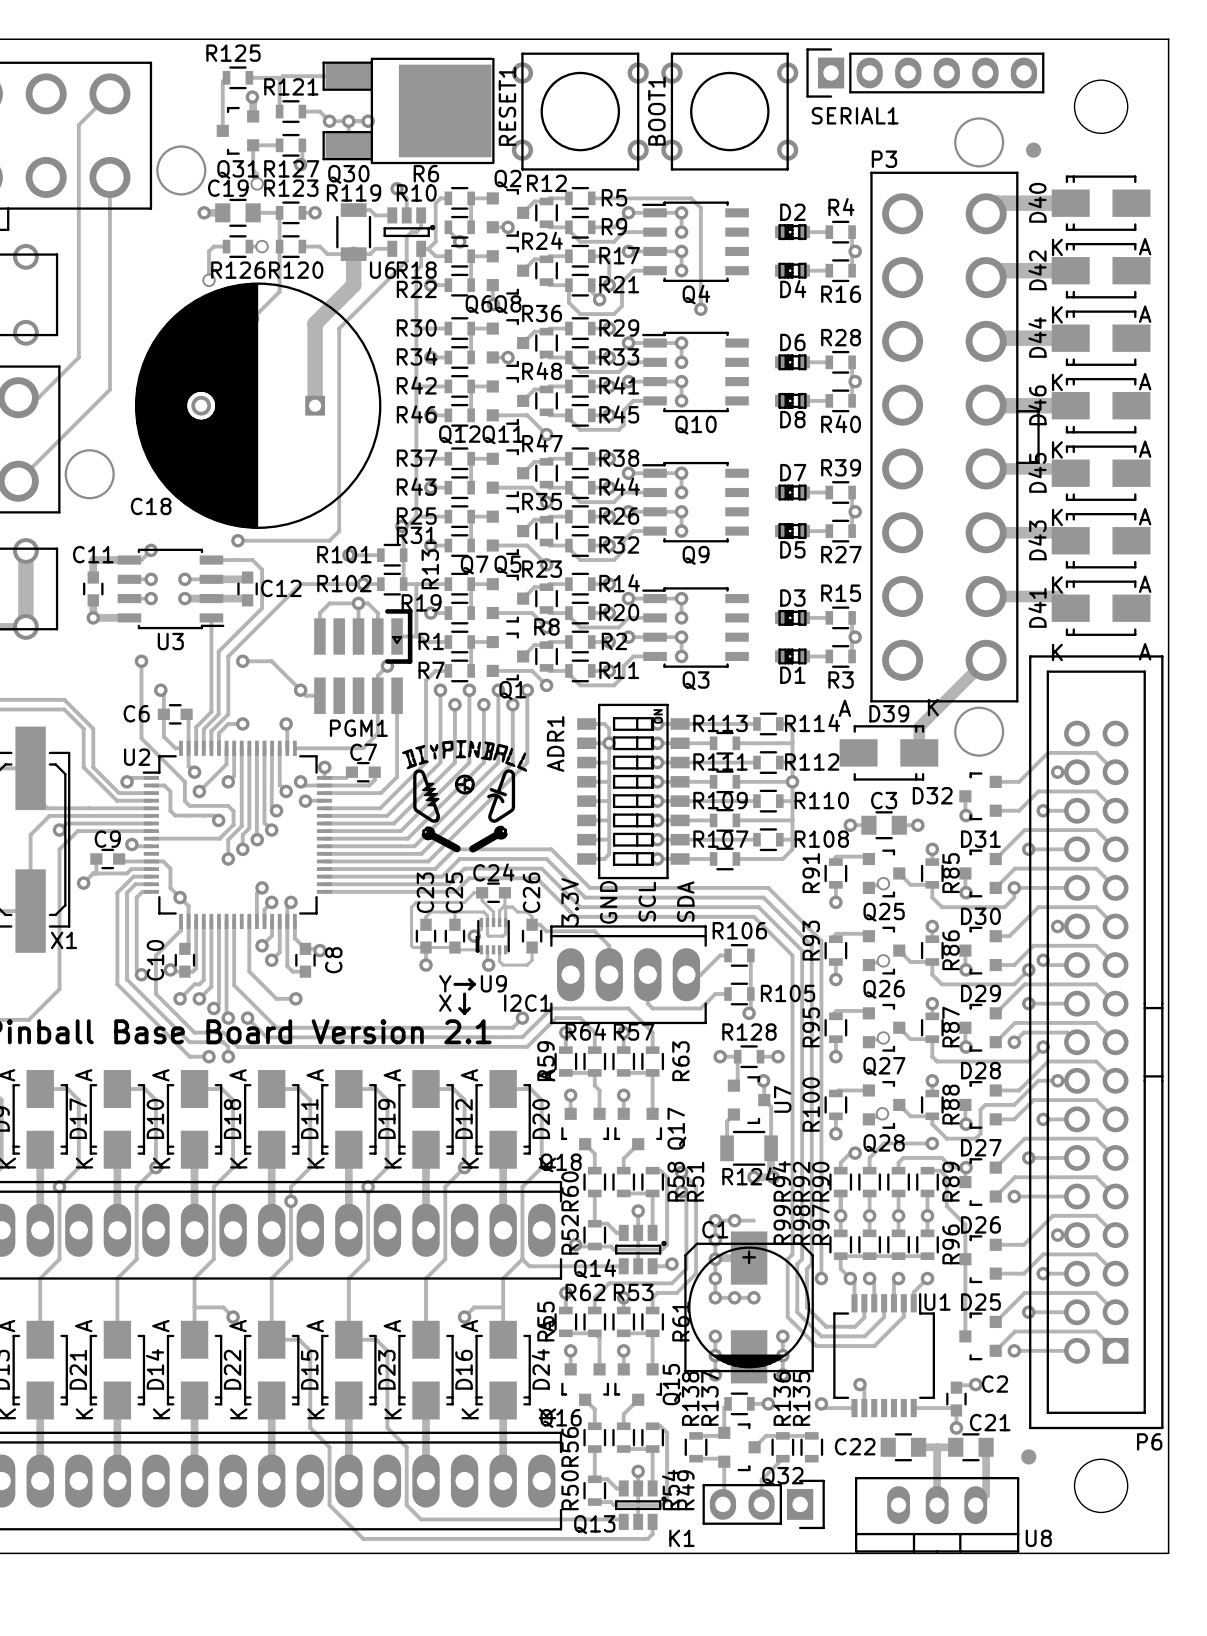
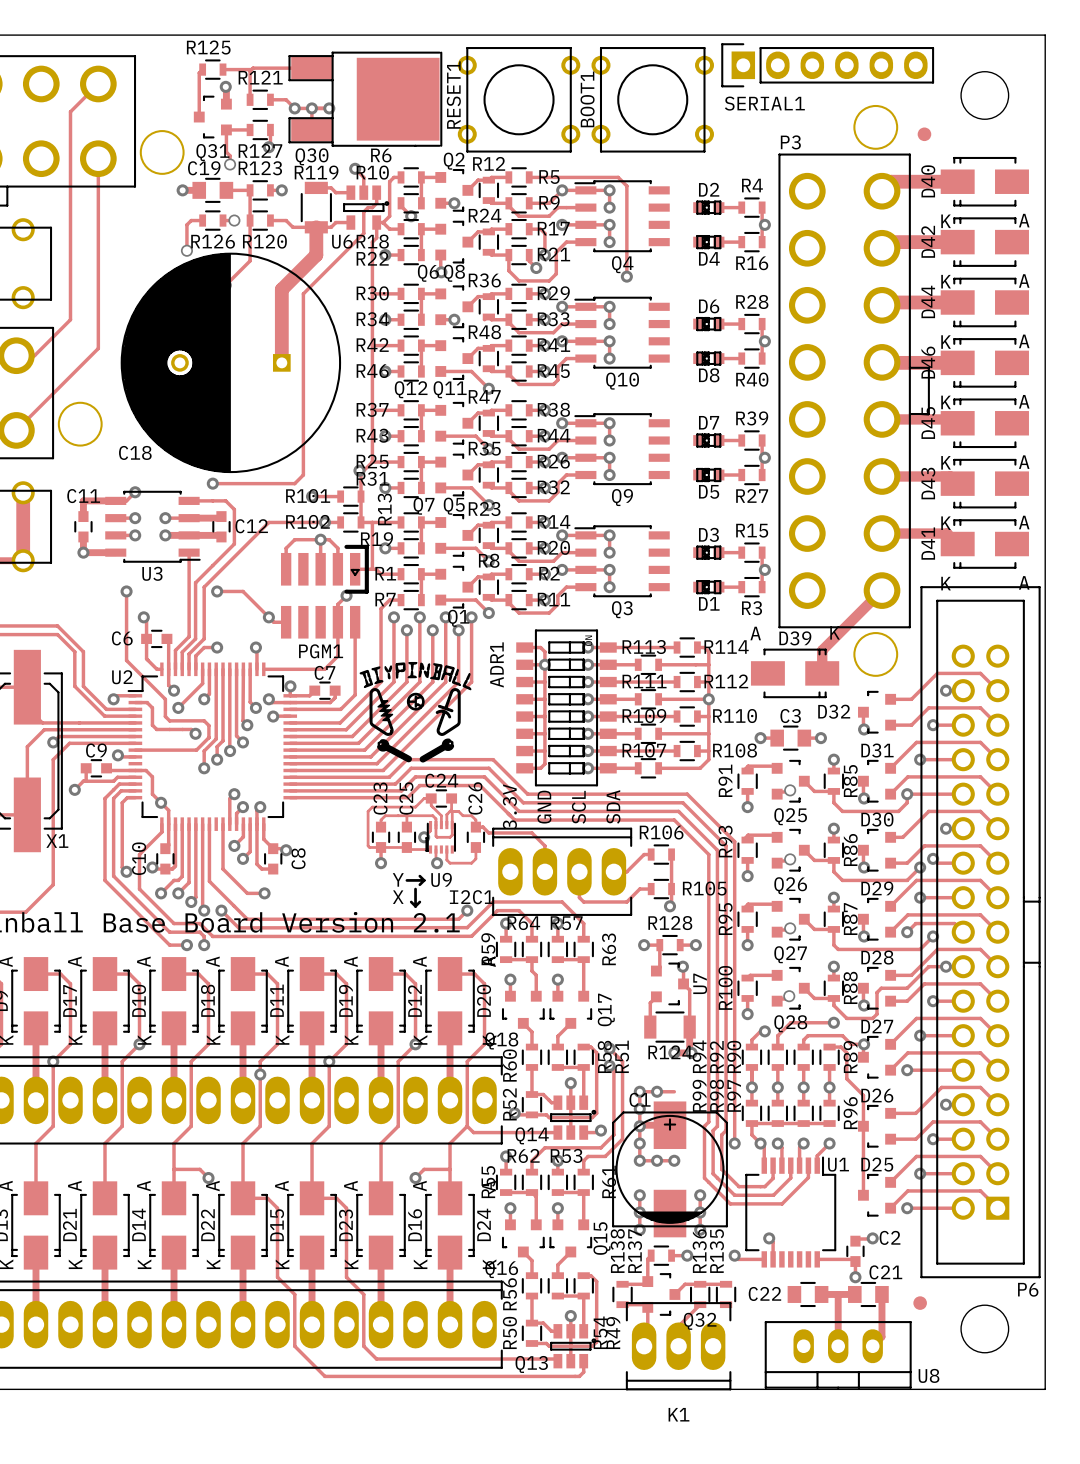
K1 footprint: [702, 1479, 825, 1530] -> [625, 1302, 732, 1391]
K1 name position: K1 (681, 1538) -> K1 (678, 1414)

